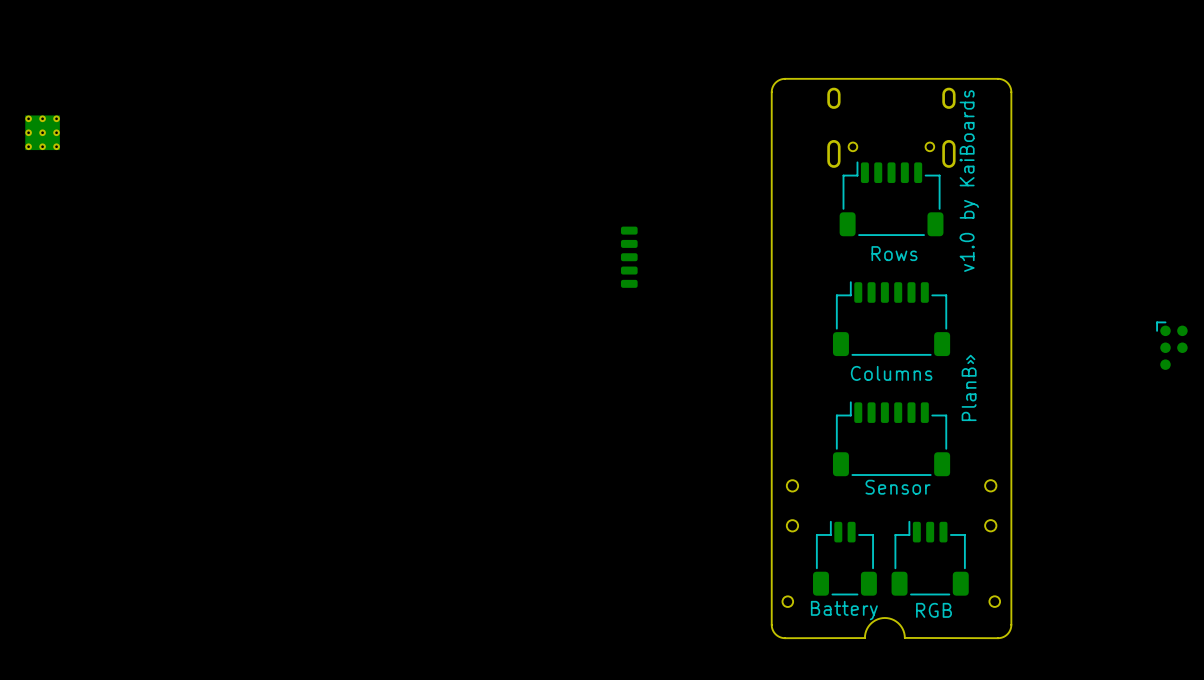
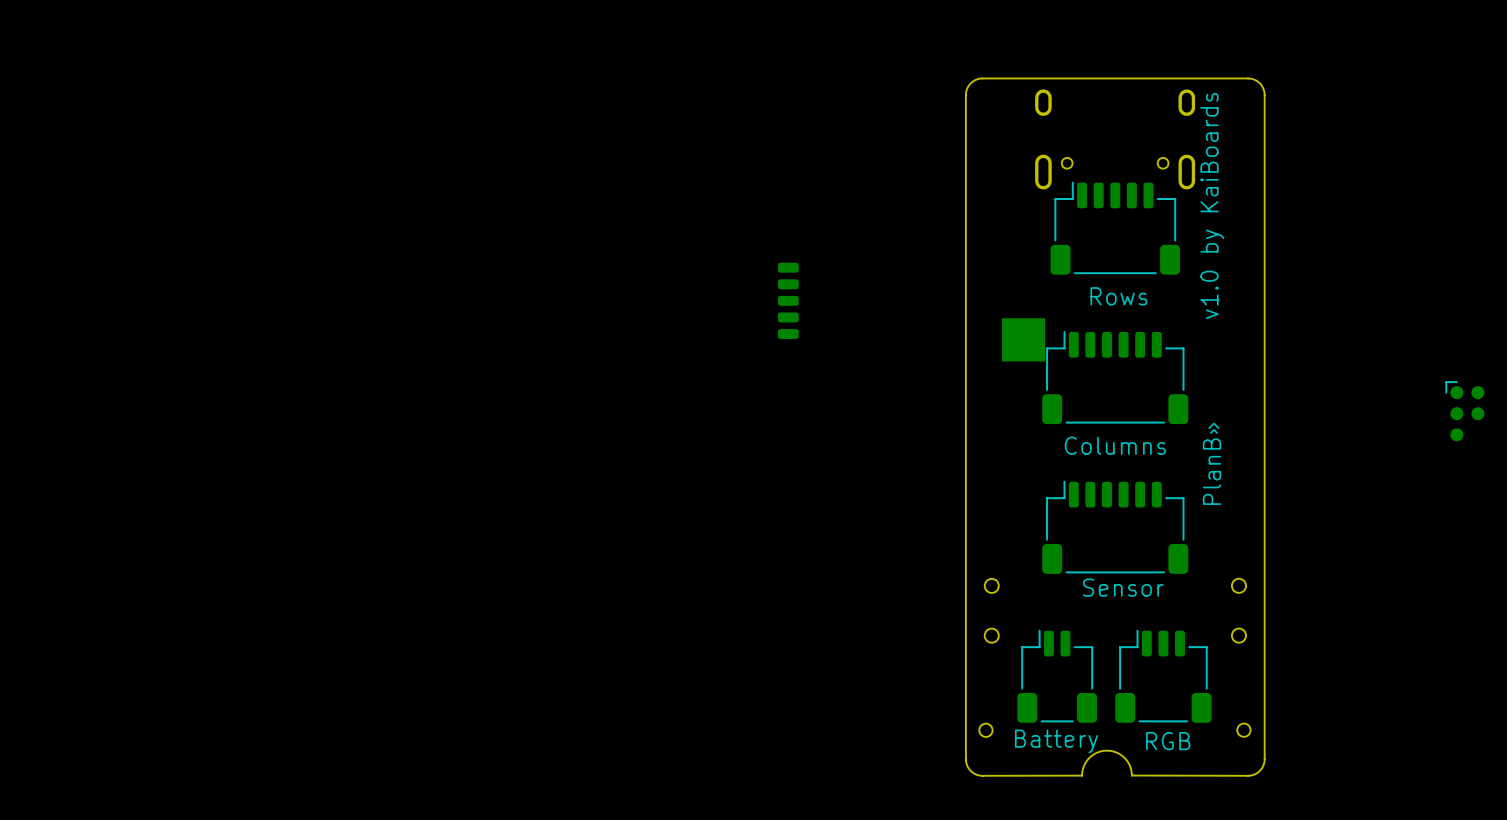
part: (42, 132) -> none
part: none -> (1023, 339)

